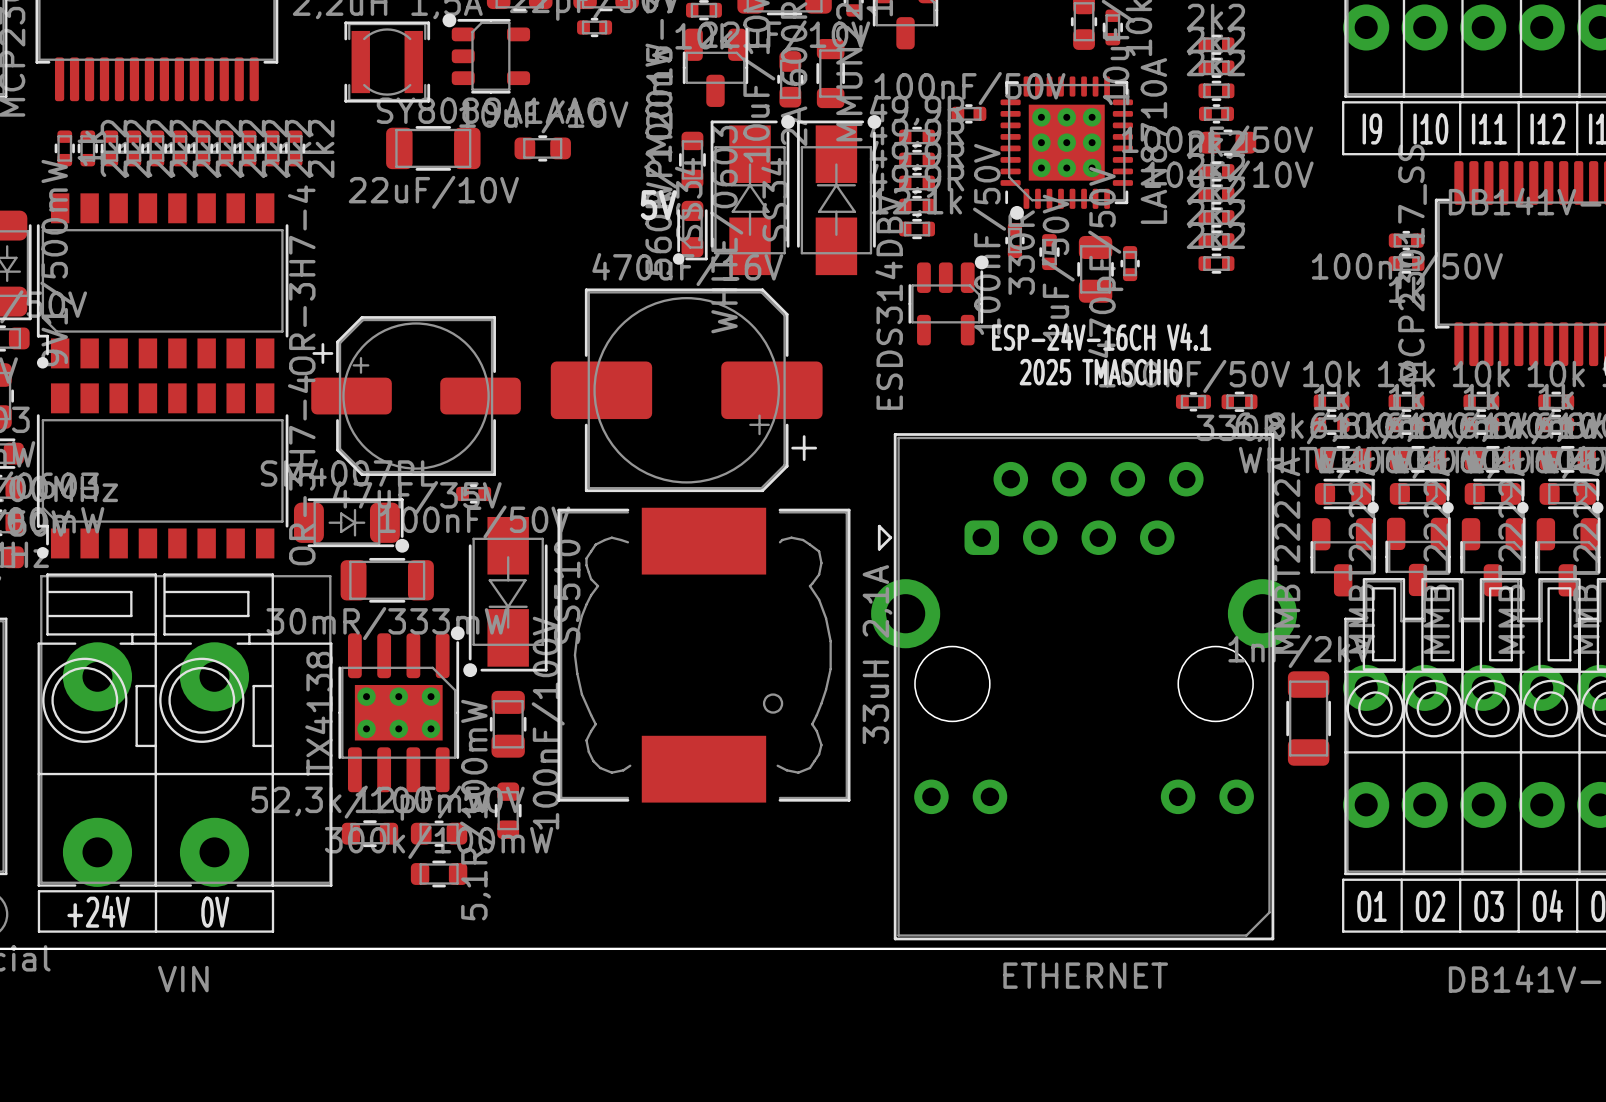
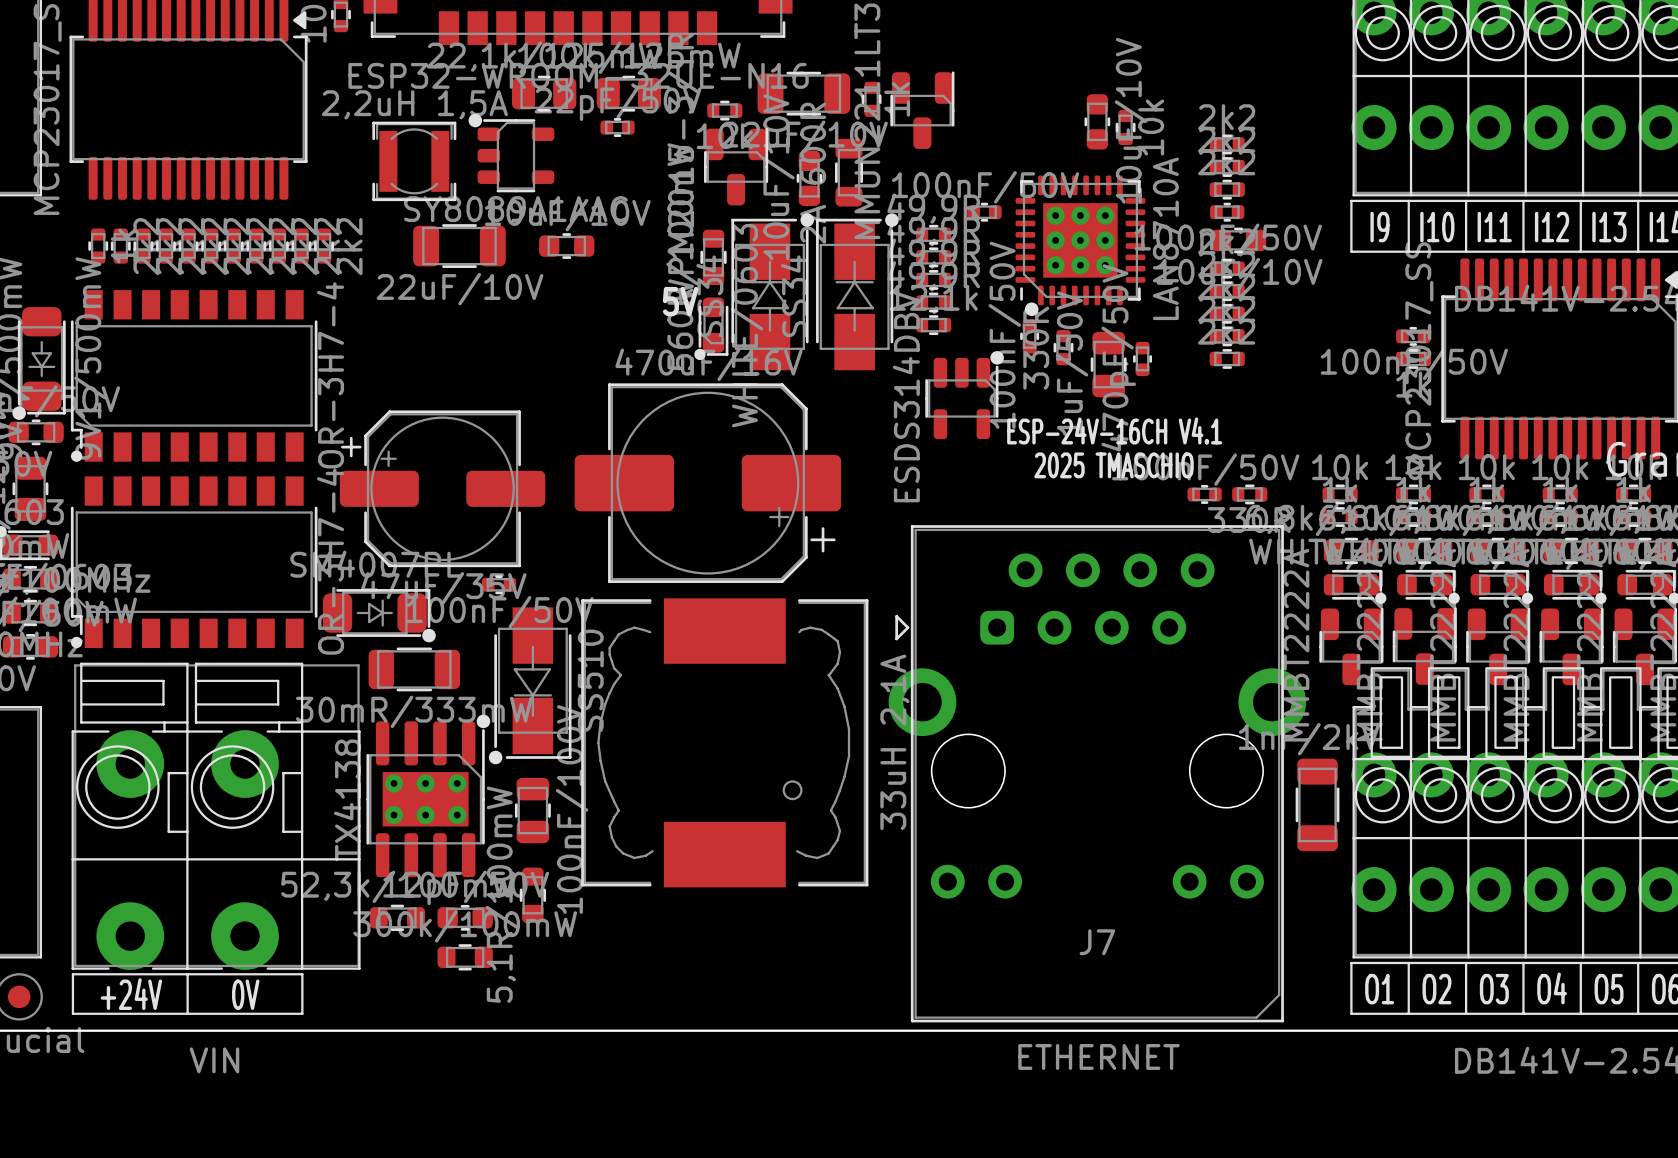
J7 name: none -> J7 (1097, 942)

